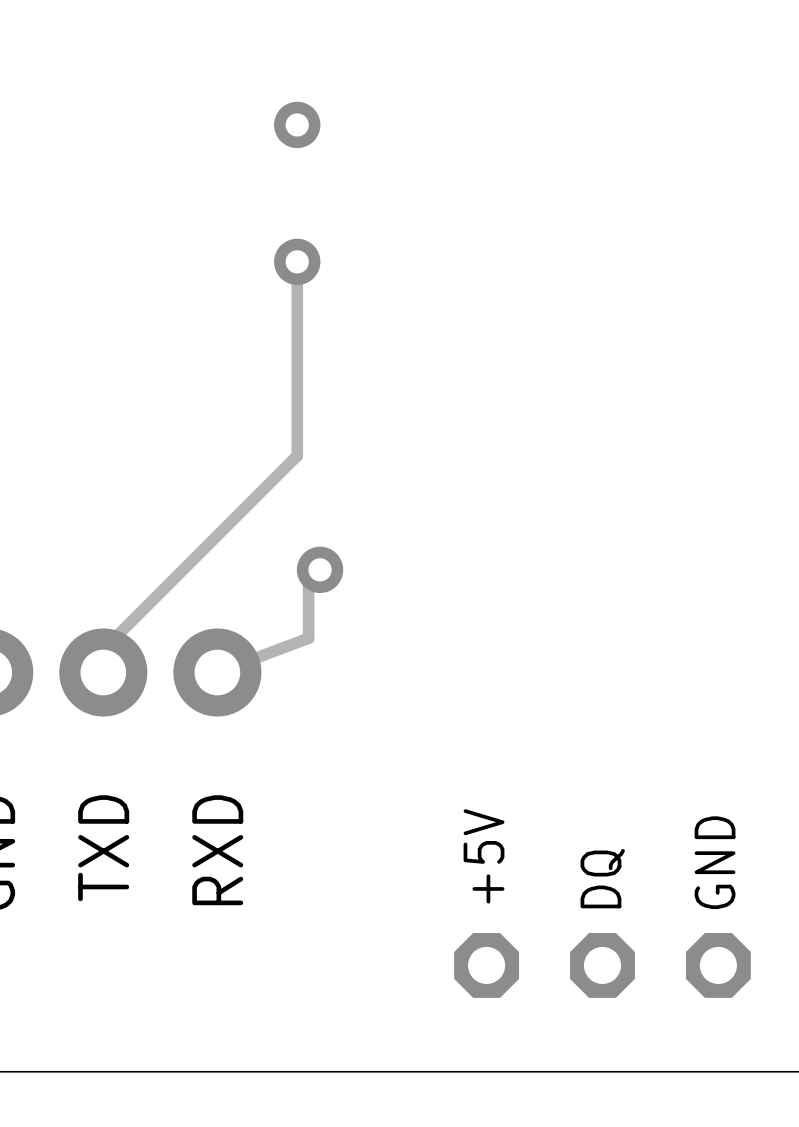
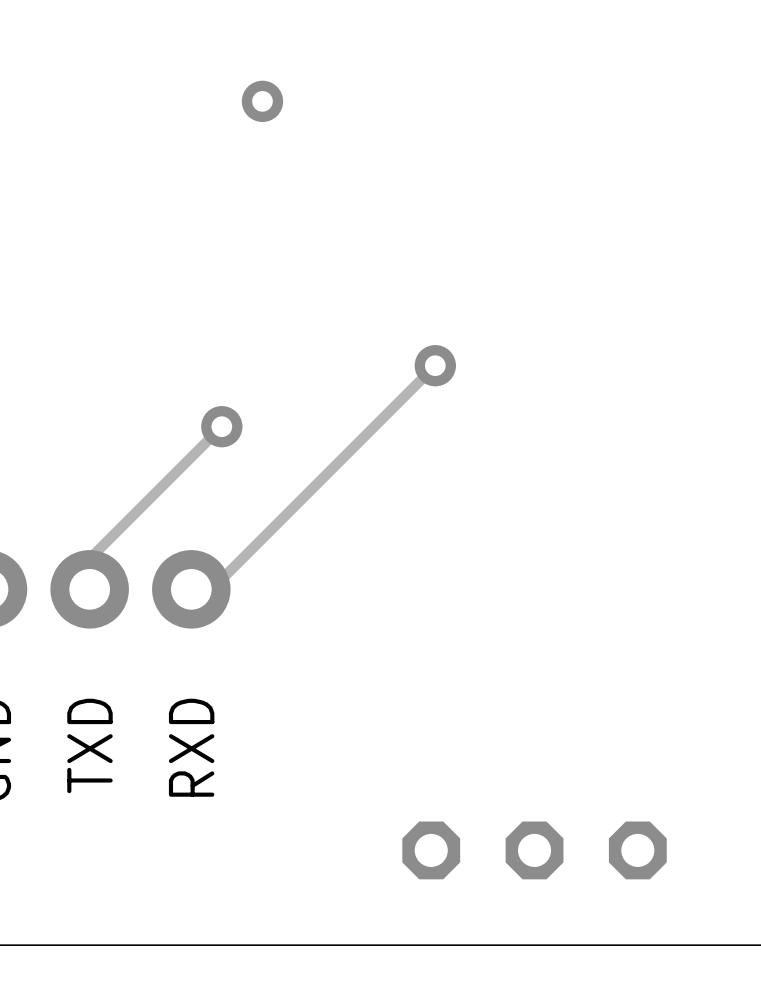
track: (297, 261) (297, 455) (103, 649) -> (221, 426) (89, 558) (89, 569)
via: (297, 261) -> none
via: none -> (435, 365)
track: (320, 569) (308, 569) (308, 638) (217, 672) -> (435, 365) (211, 589) (191, 589)
via position: (320, 569) -> (221, 426)
text: +5V (484, 856) -> none
text: GND (715, 862) -> none
text: DQ (602, 878) -> none

